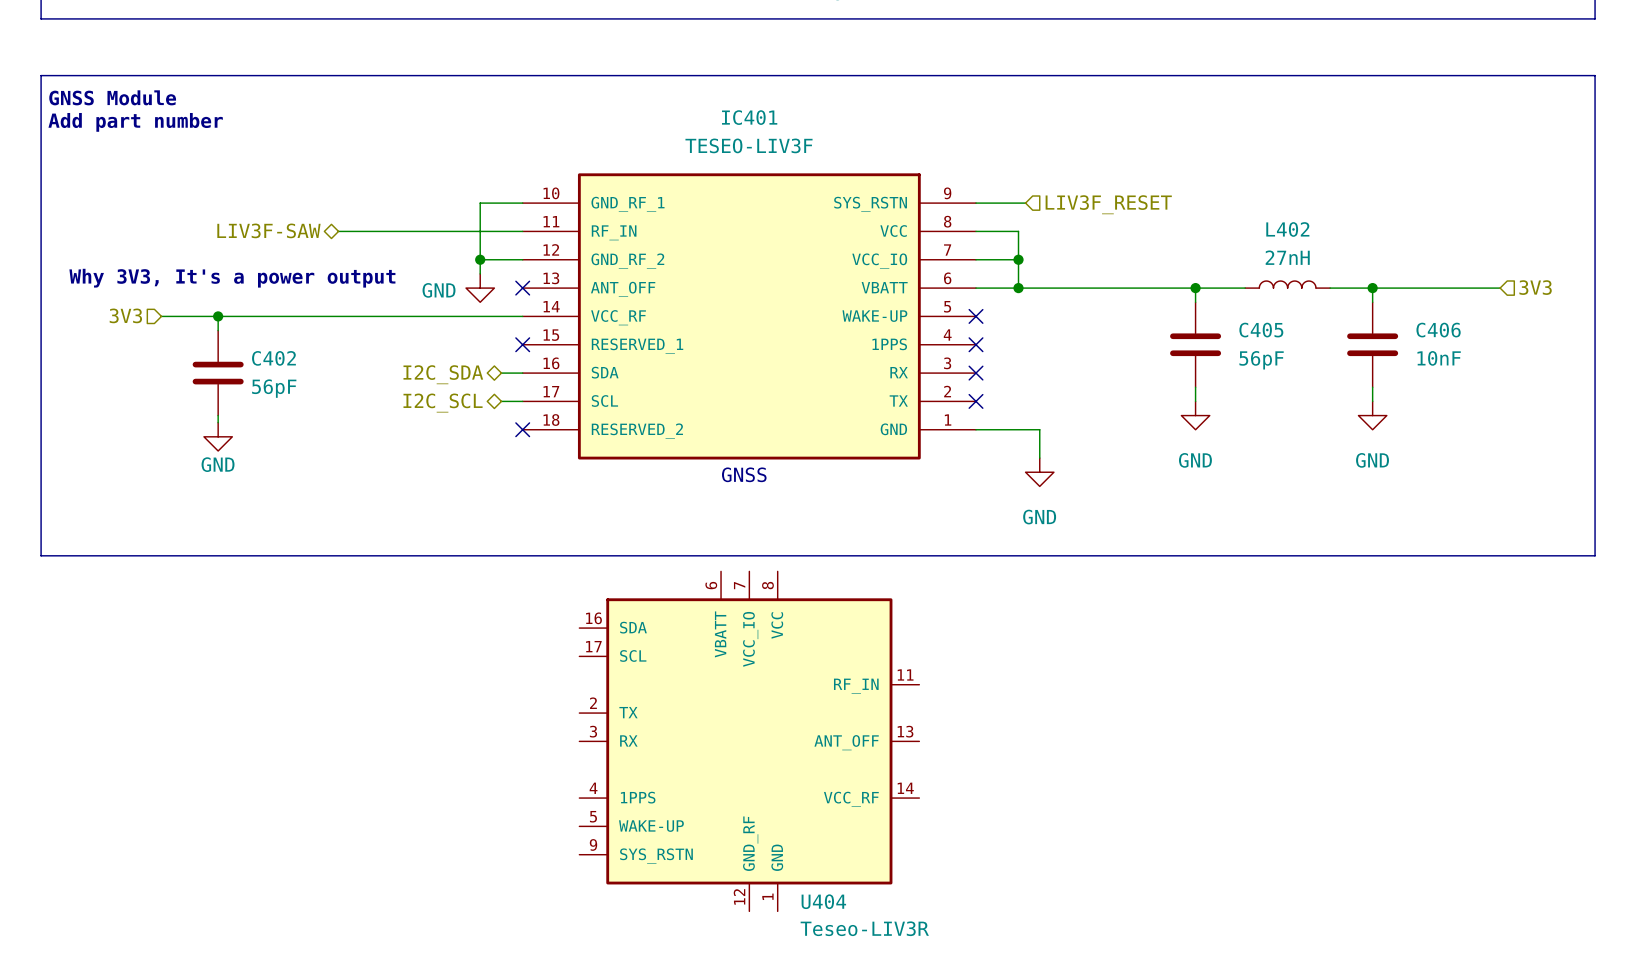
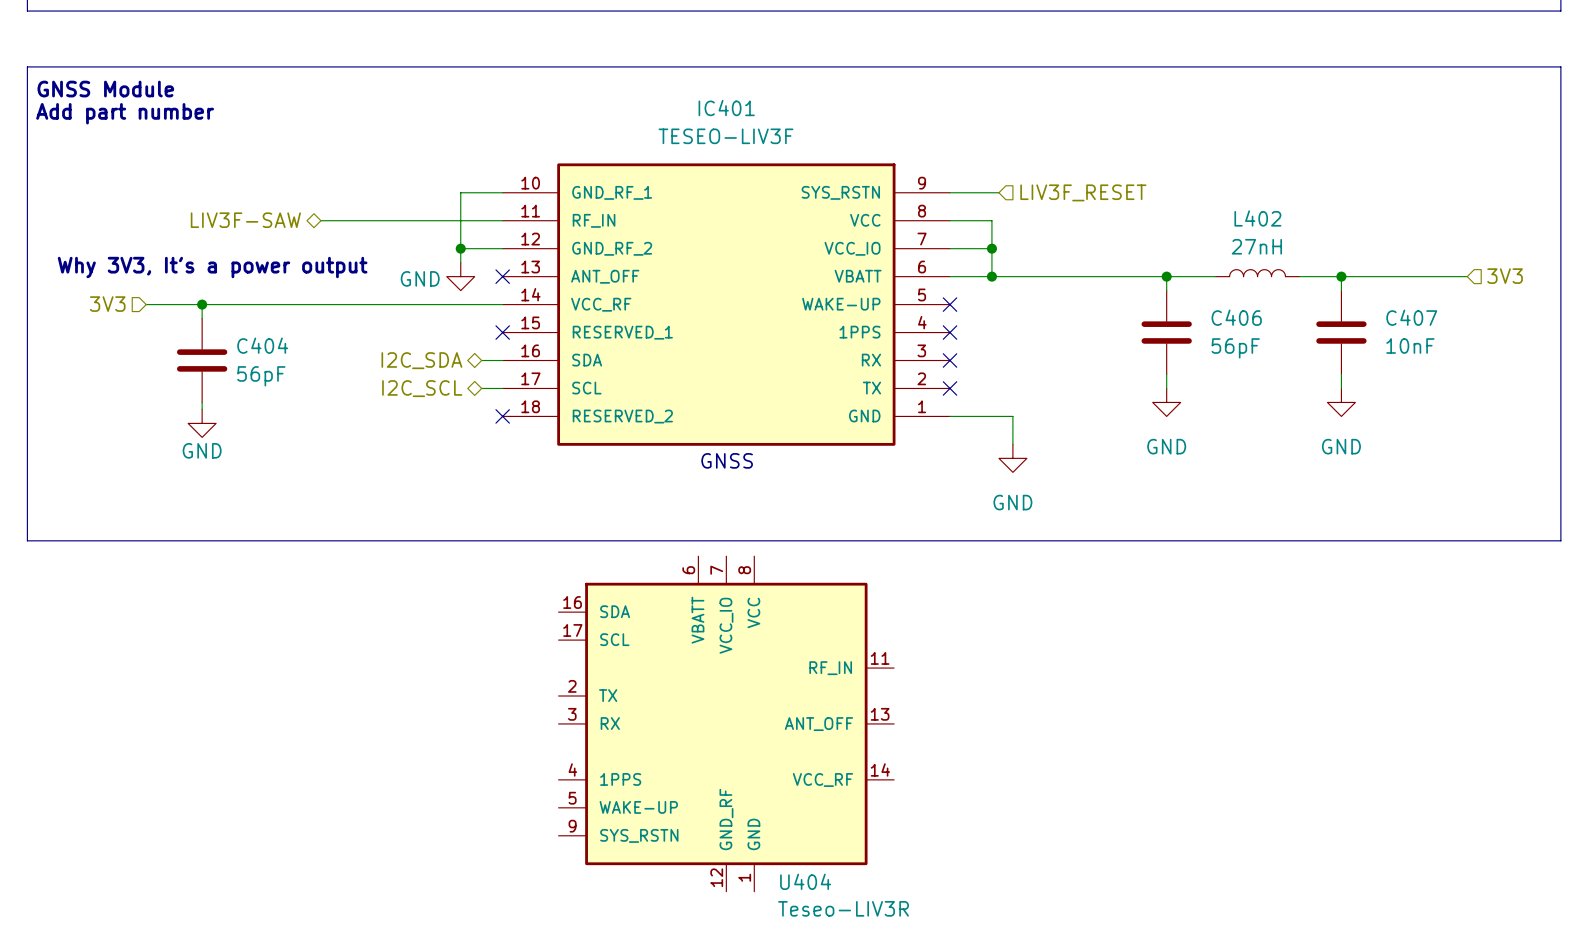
C405 name: C405 (1261, 330) -> C406 (1236, 317)
C406 name: C406 (1438, 330) -> C407 (1411, 317)
C402 name: C402 (273, 358) -> C404 (262, 345)

